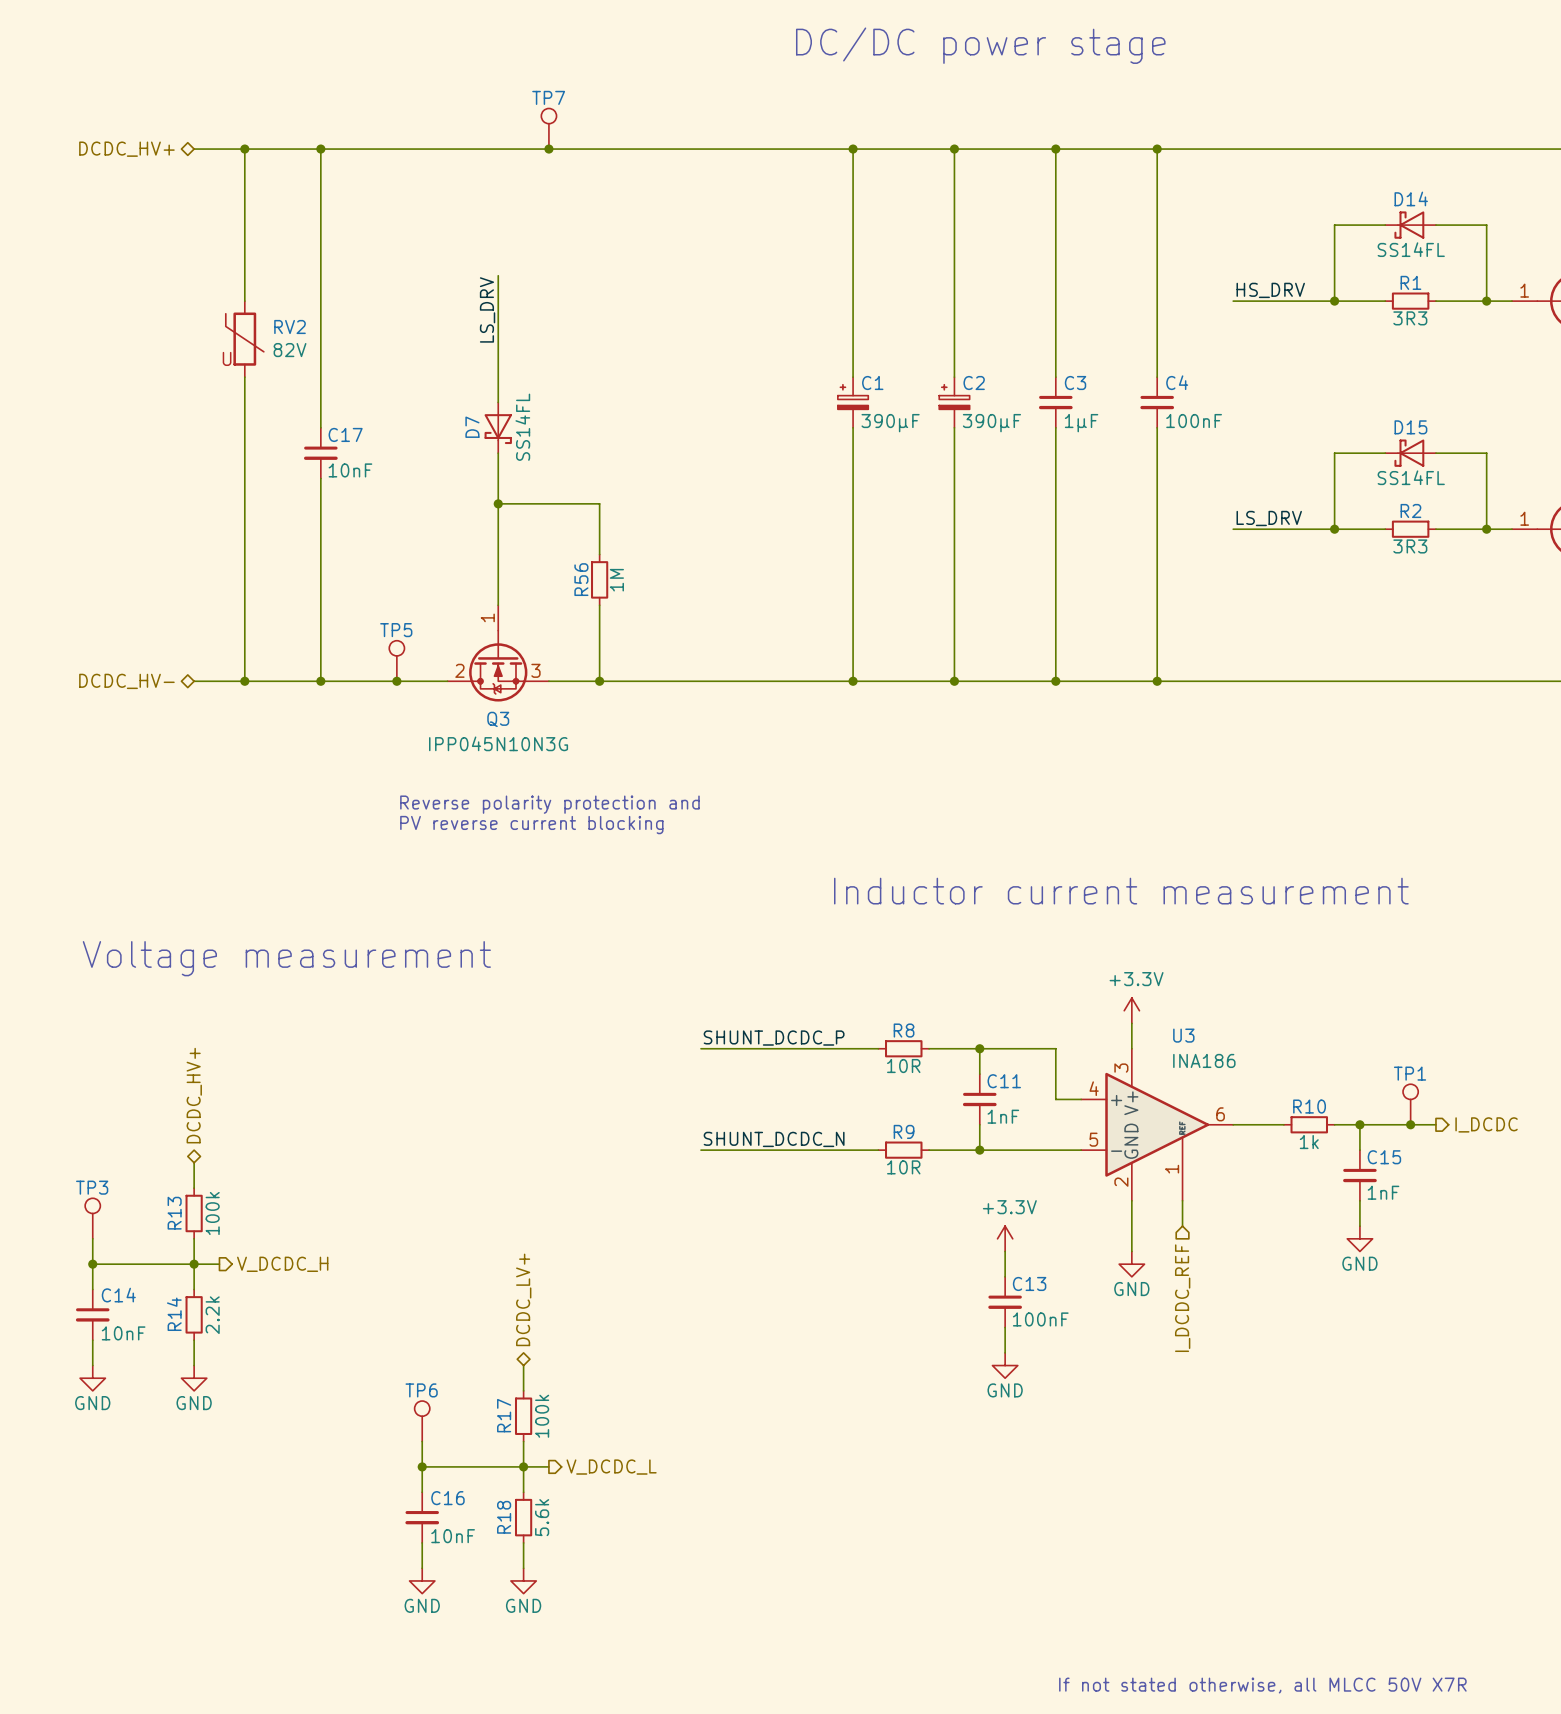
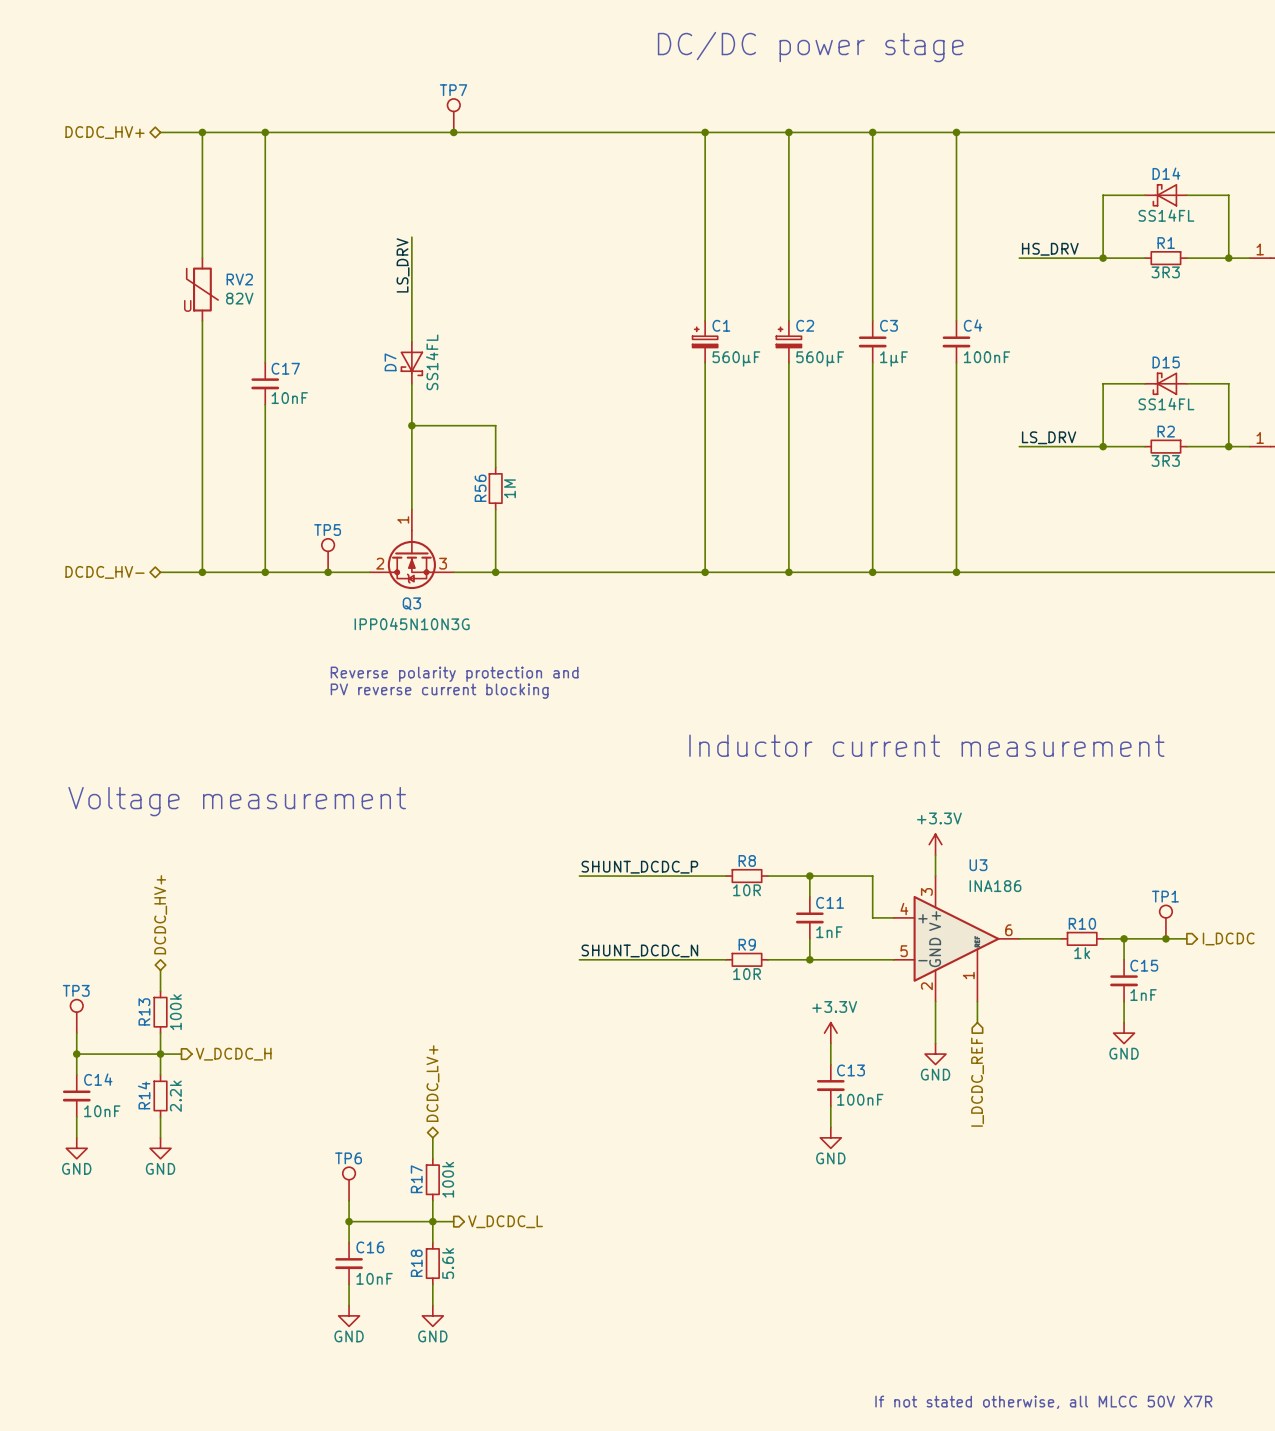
C1 value: 390µF (890, 423) -> 560µF (736, 358)
C2 value: 390µF (991, 423) -> 560µF (820, 358)

